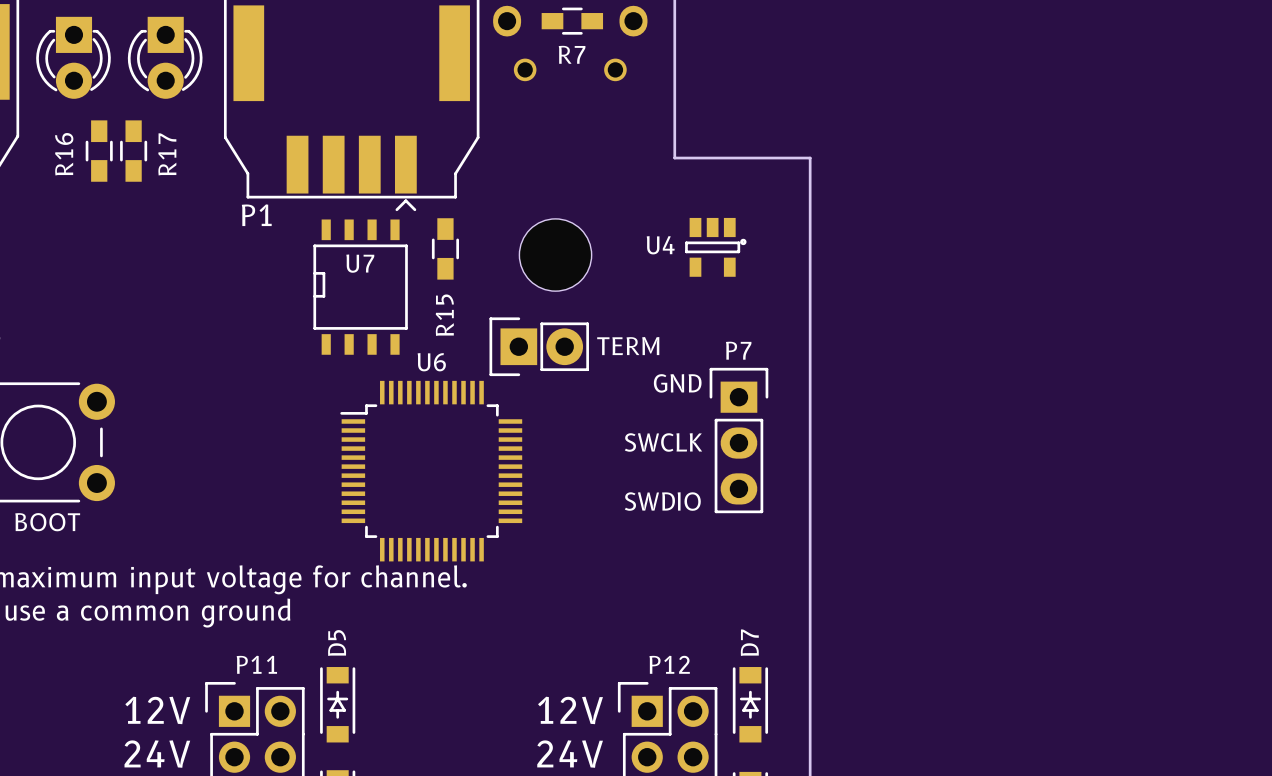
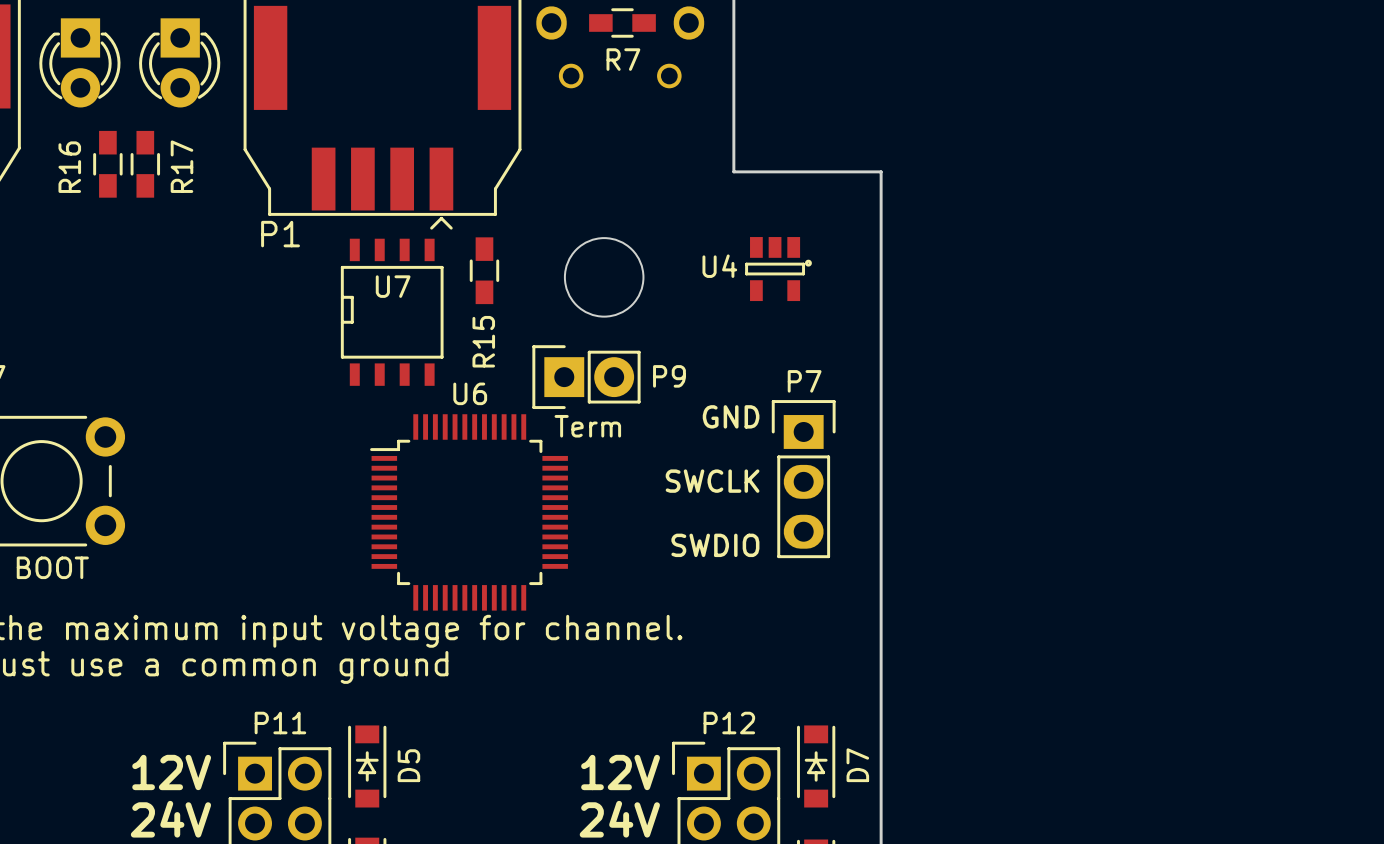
TERM name: TERM (628, 346) -> P9 (669, 376)
TERM value: none -> Term (587, 426)
D7 name position: D7 (749, 642) -> D7 (857, 765)
D5 name position: D5 (337, 643) -> D5 (408, 765)

